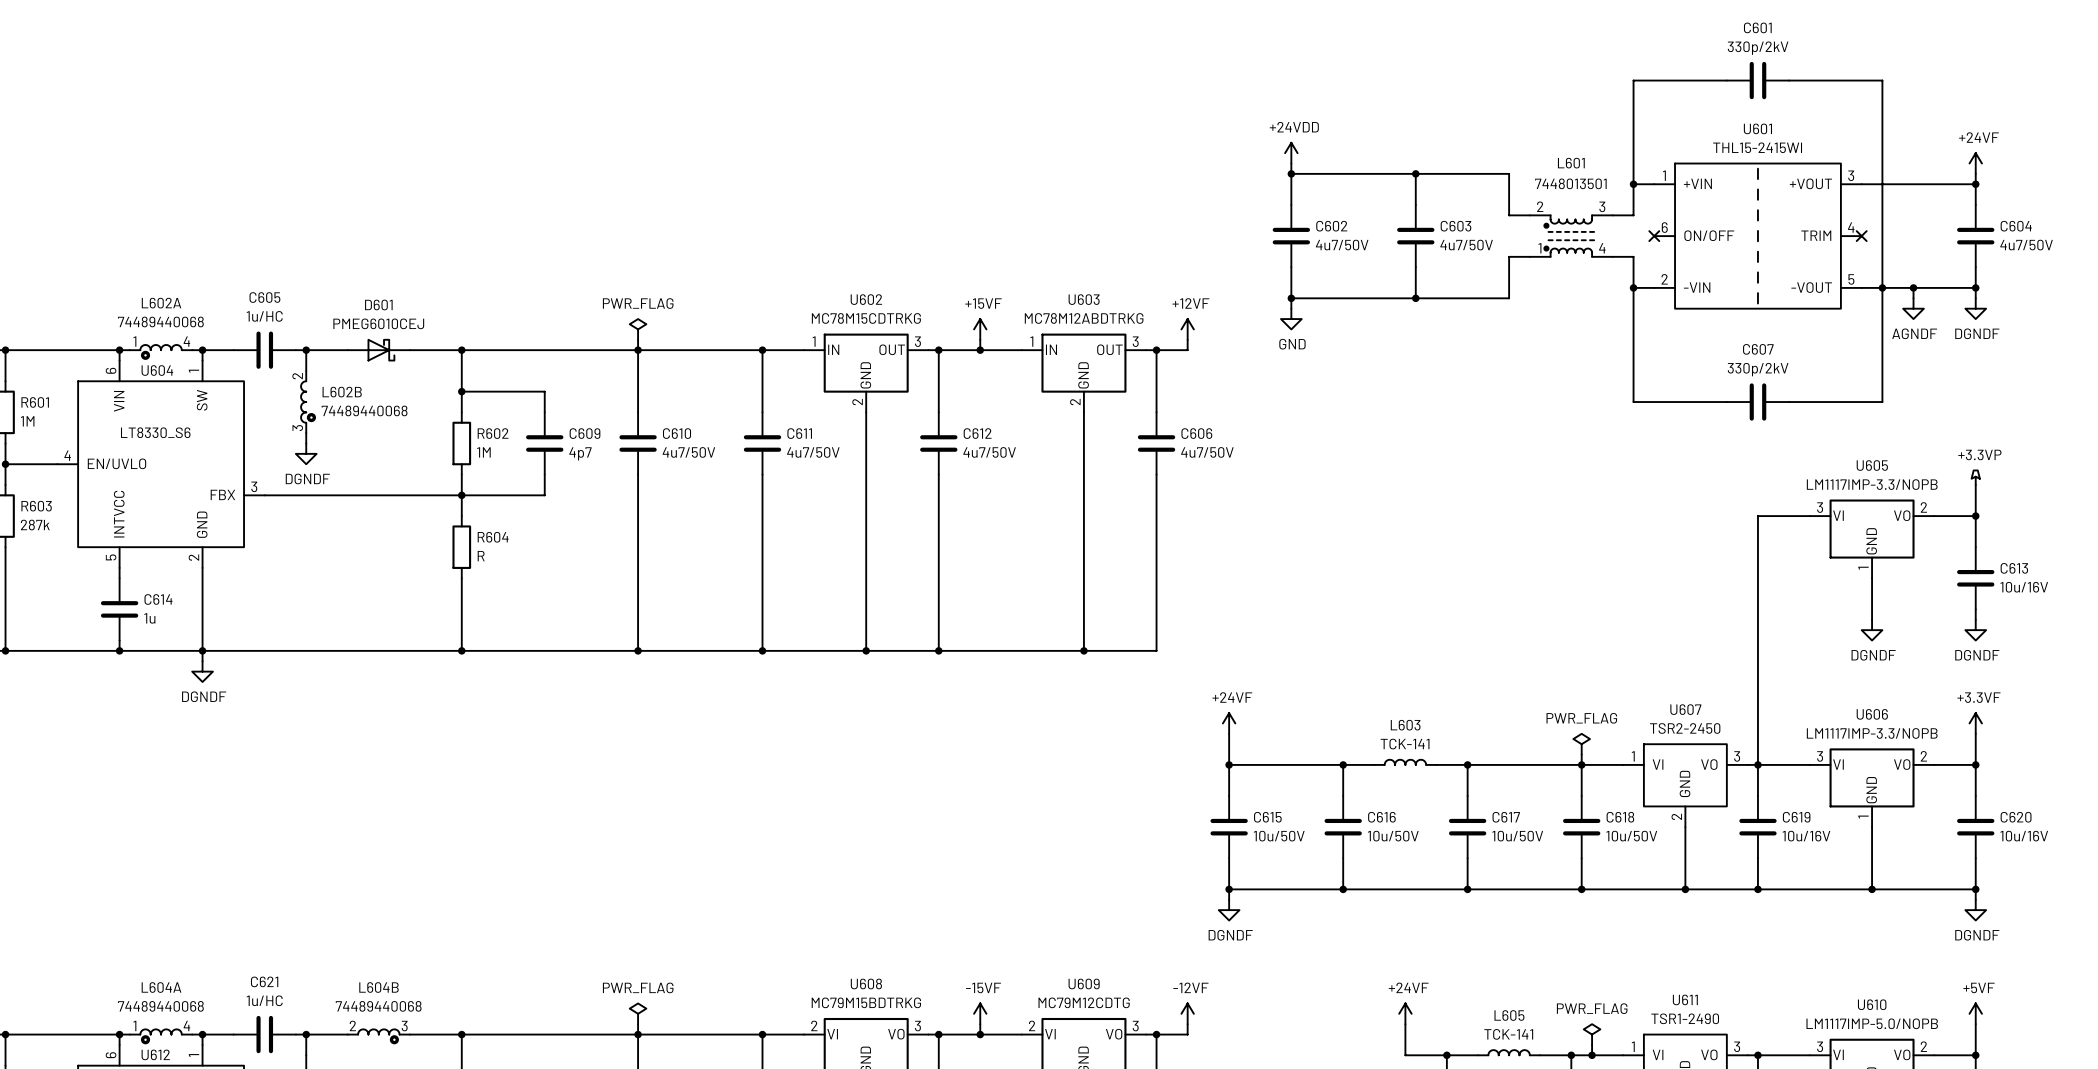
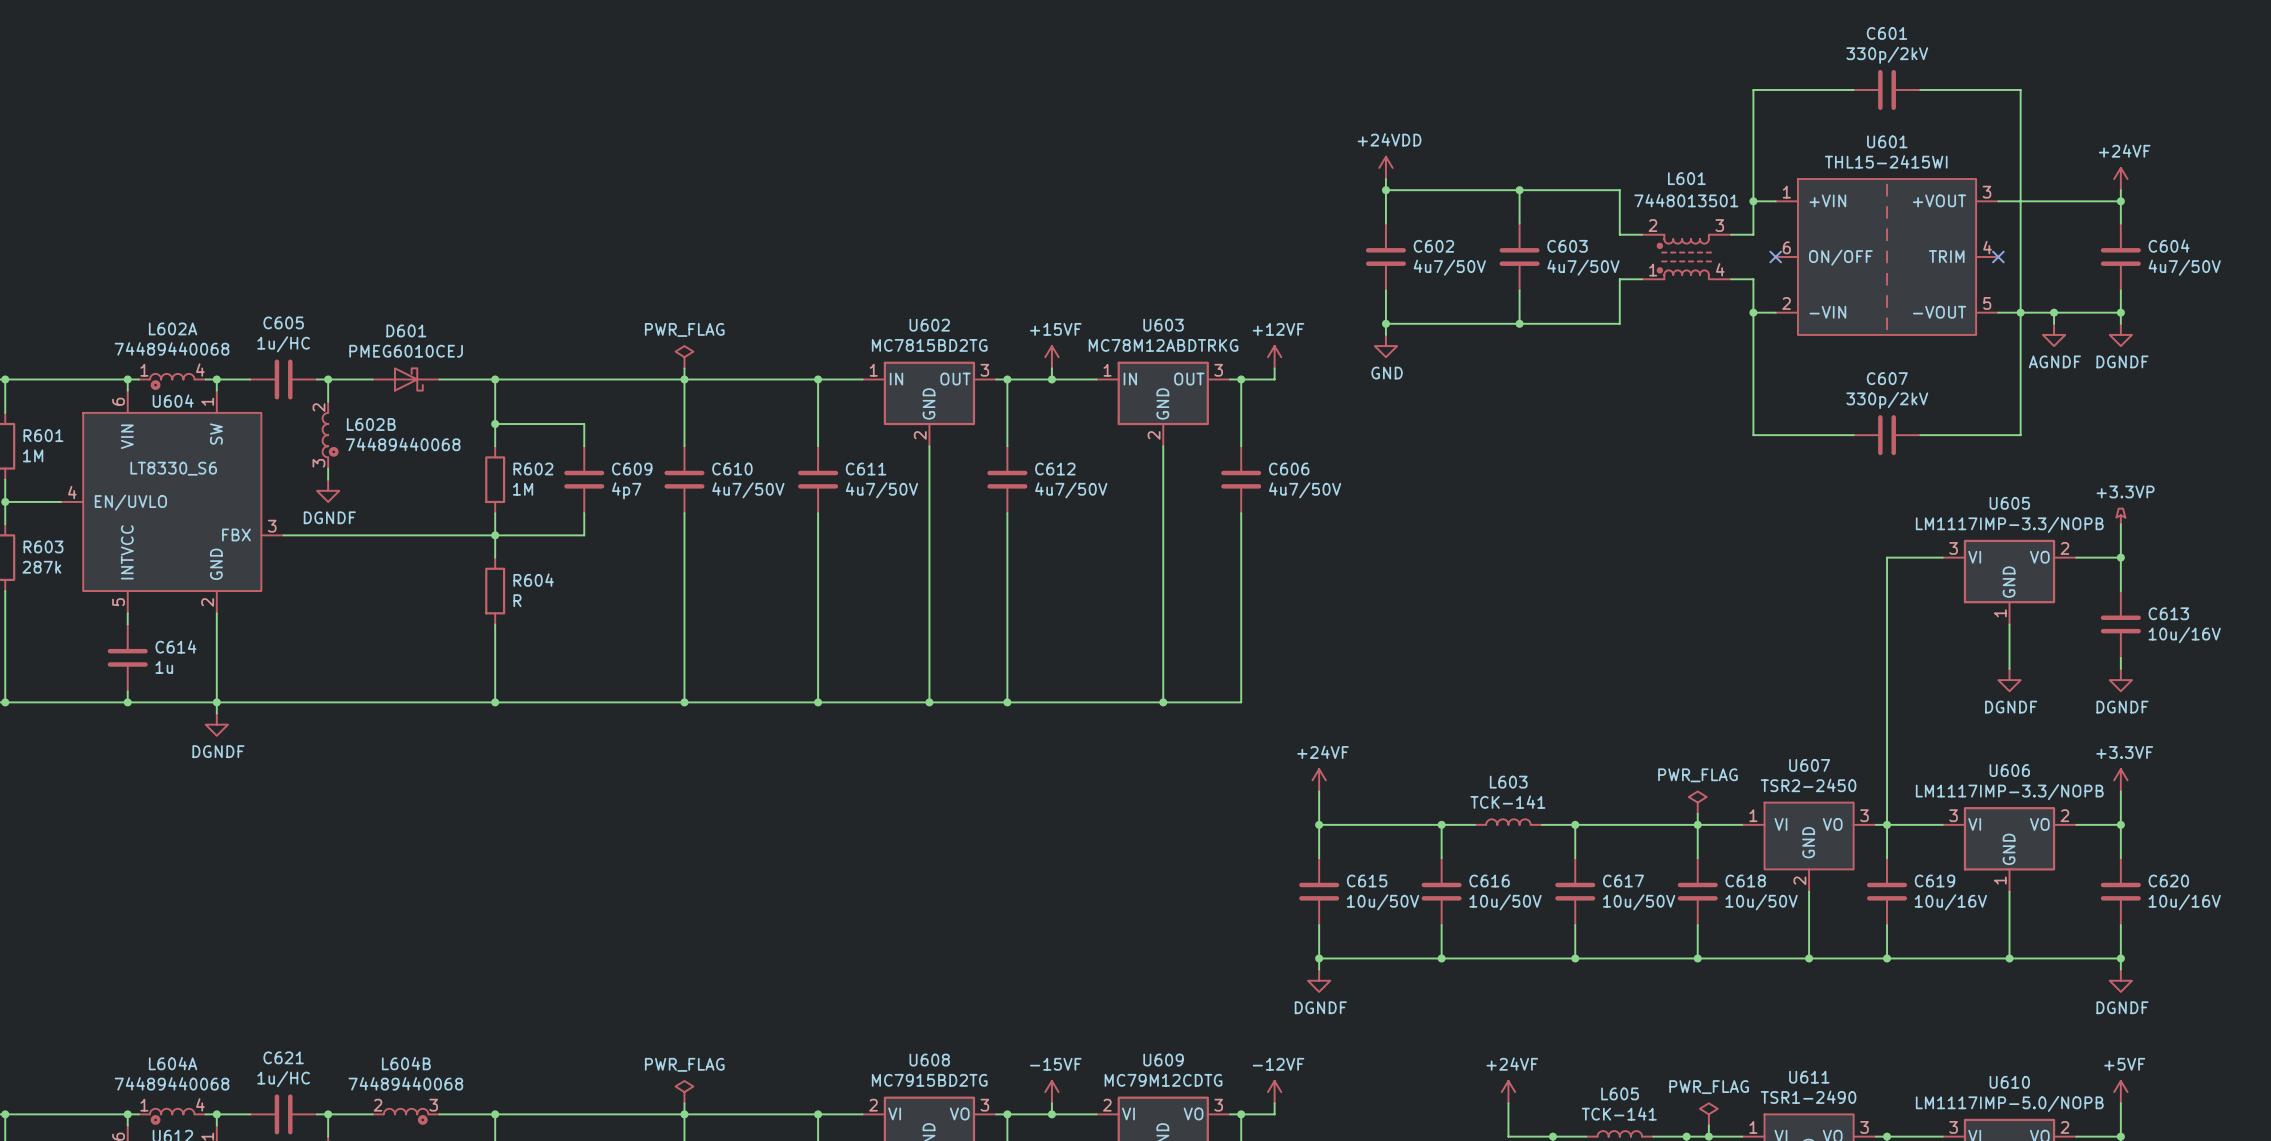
U602 value: MC78M15CDTRKG (866, 318) -> MC7815BD2TG (929, 345)
U608 value: MC79M15BDTRKG (866, 1002) -> MC7915BD2TG (929, 1080)

